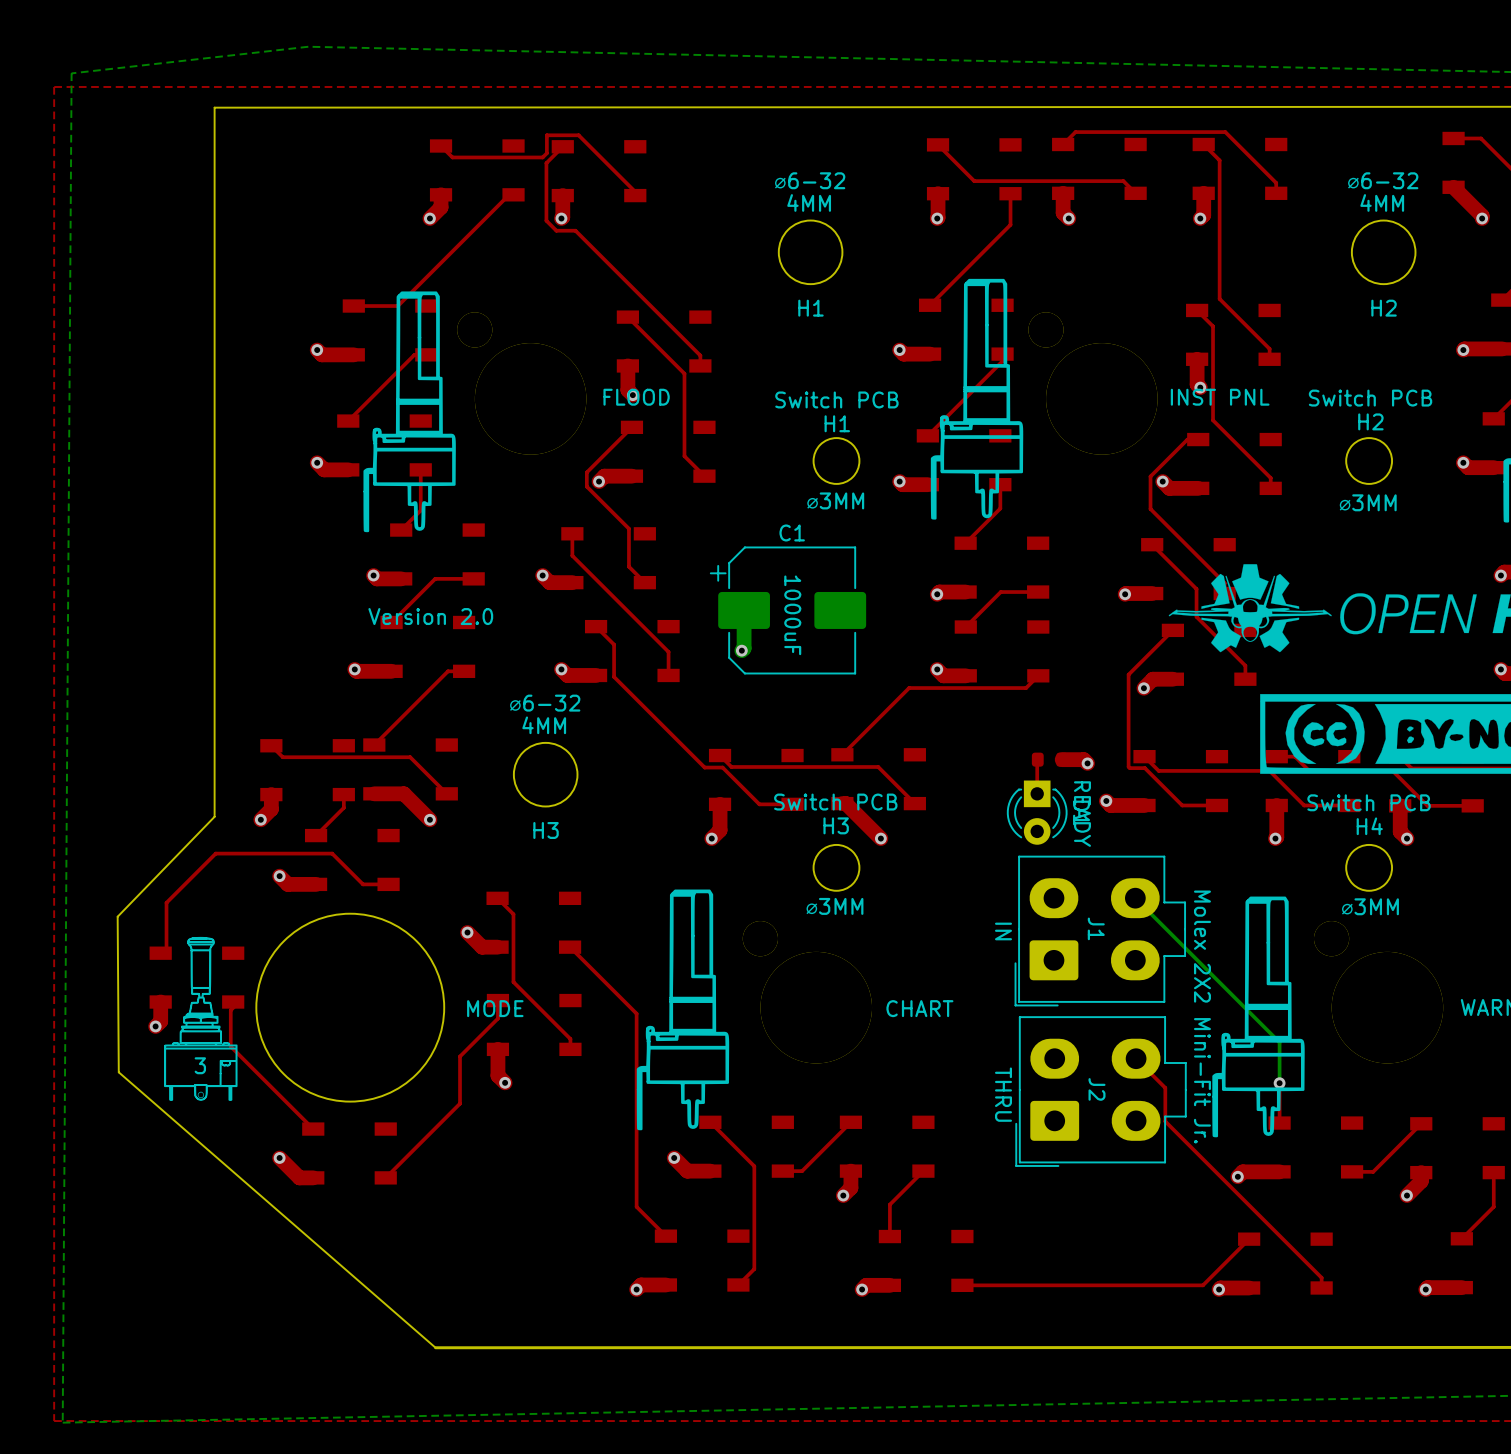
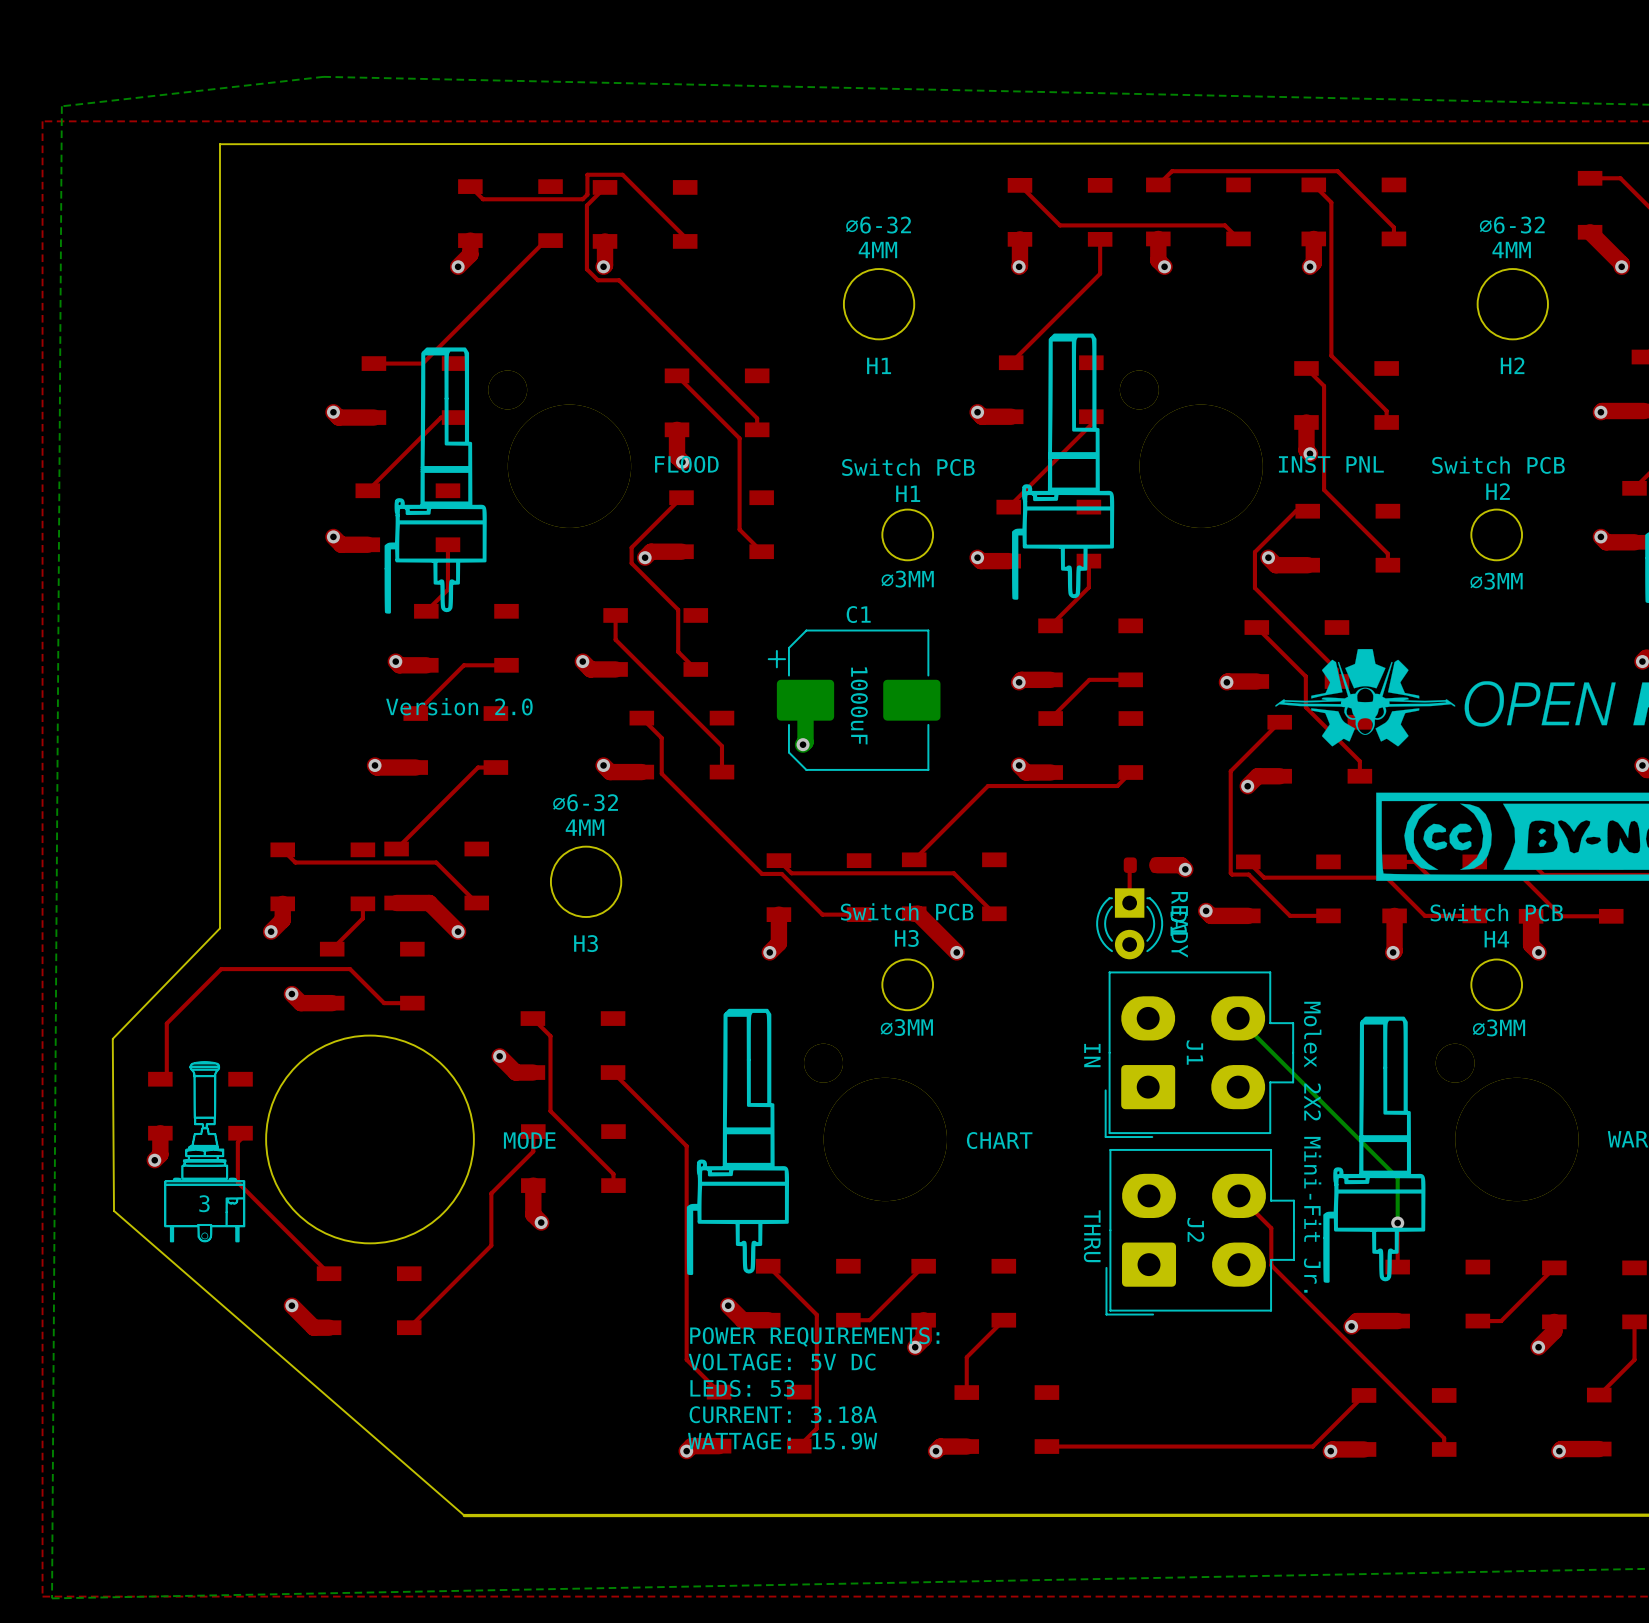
text: none -> POWER REQUIREMENTS: (814, 1337)
text: none -> VOLTAGE: 5V DC (782, 1362)
text: none -> LEDS: 53 (742, 1388)
text: none -> CURRENT: 3.18A (783, 1414)
text: none -> WATTAGE: 15.9W (782, 1441)

